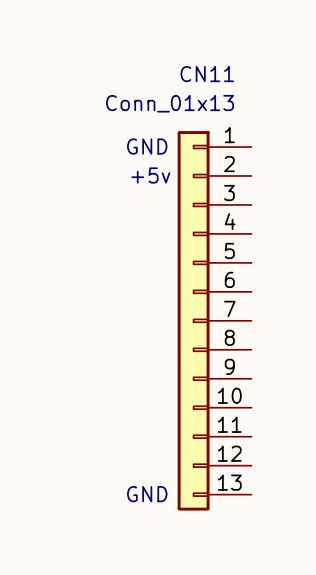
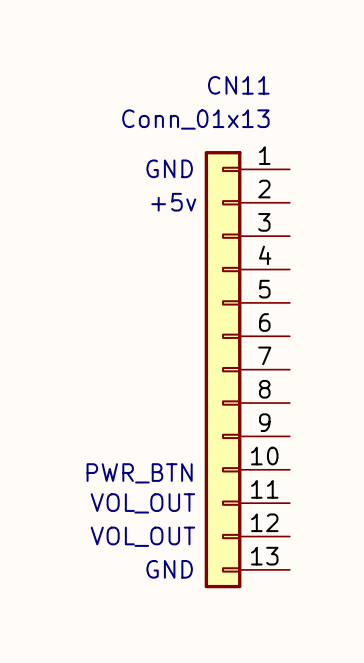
text: none -> PWR_BTN (139, 473)
text: none -> VOL_OUT (142, 503)
text: none -> VOL_OUT (142, 536)

